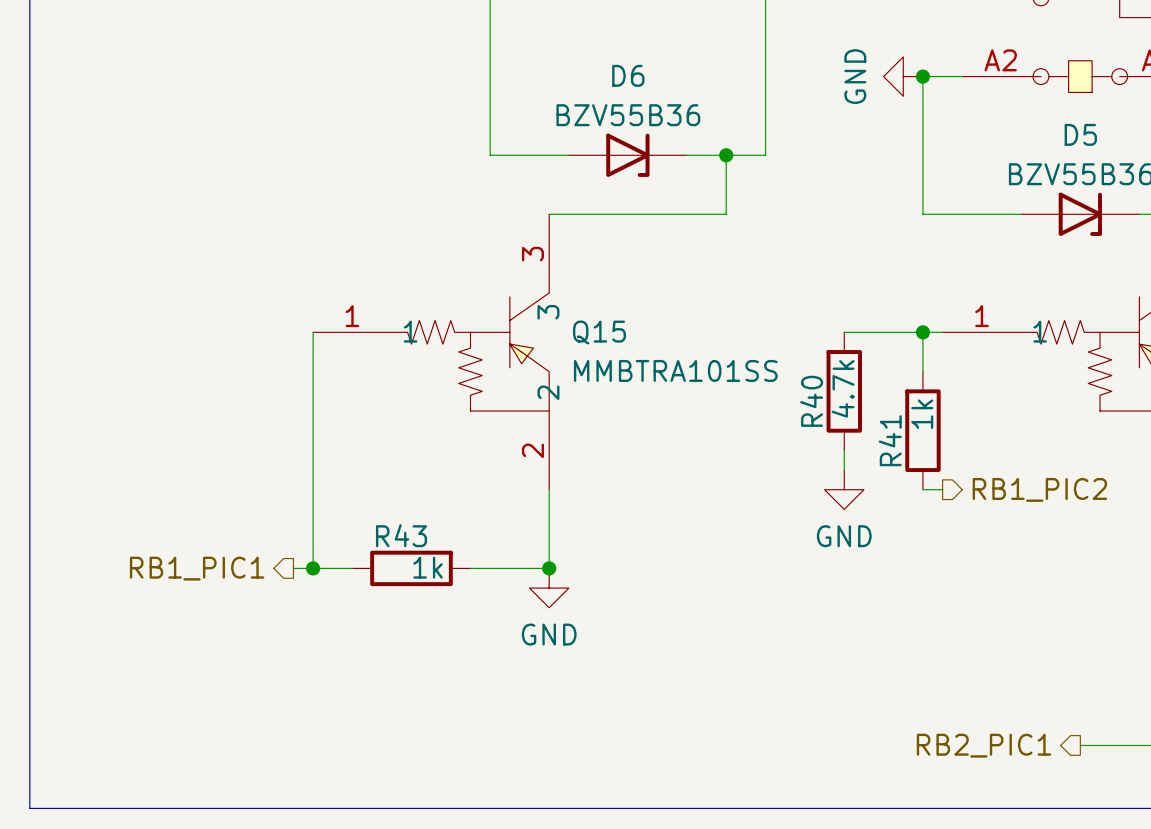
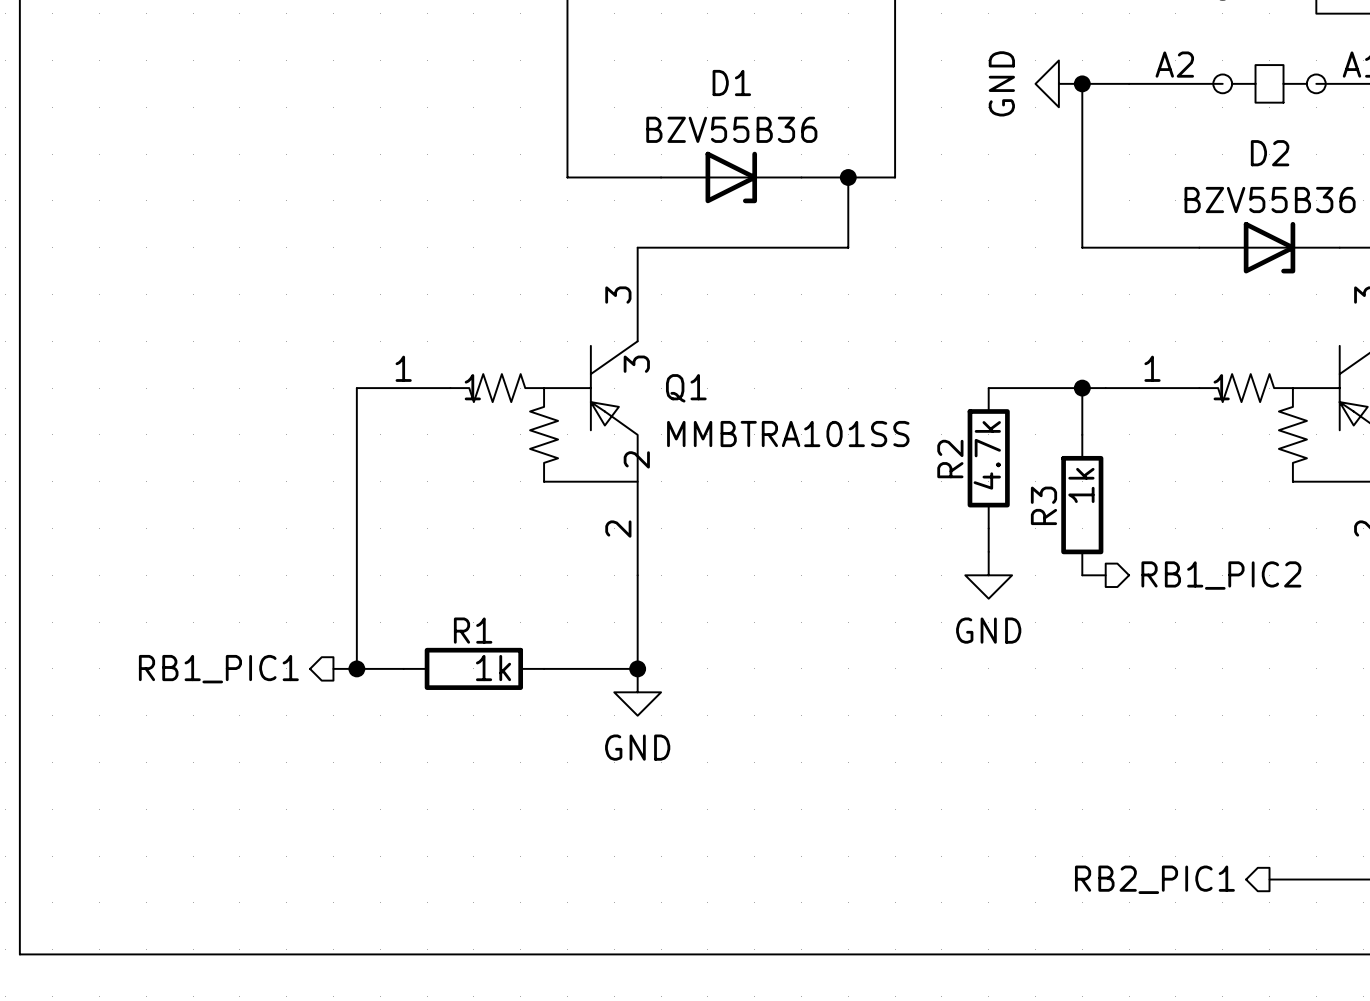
D6 name: D6 (628, 75) -> D1 (731, 82)
D5 name: D5 (1080, 134) -> D2 (1270, 153)
Q15 name: Q15 (599, 332) -> Q1 (686, 388)
R40 name: R40 (811, 401) -> R2 (950, 459)
R41 name: R41 (890, 440) -> R3 (1043, 505)
R43 name: R43 (401, 535) -> R1 (473, 630)

